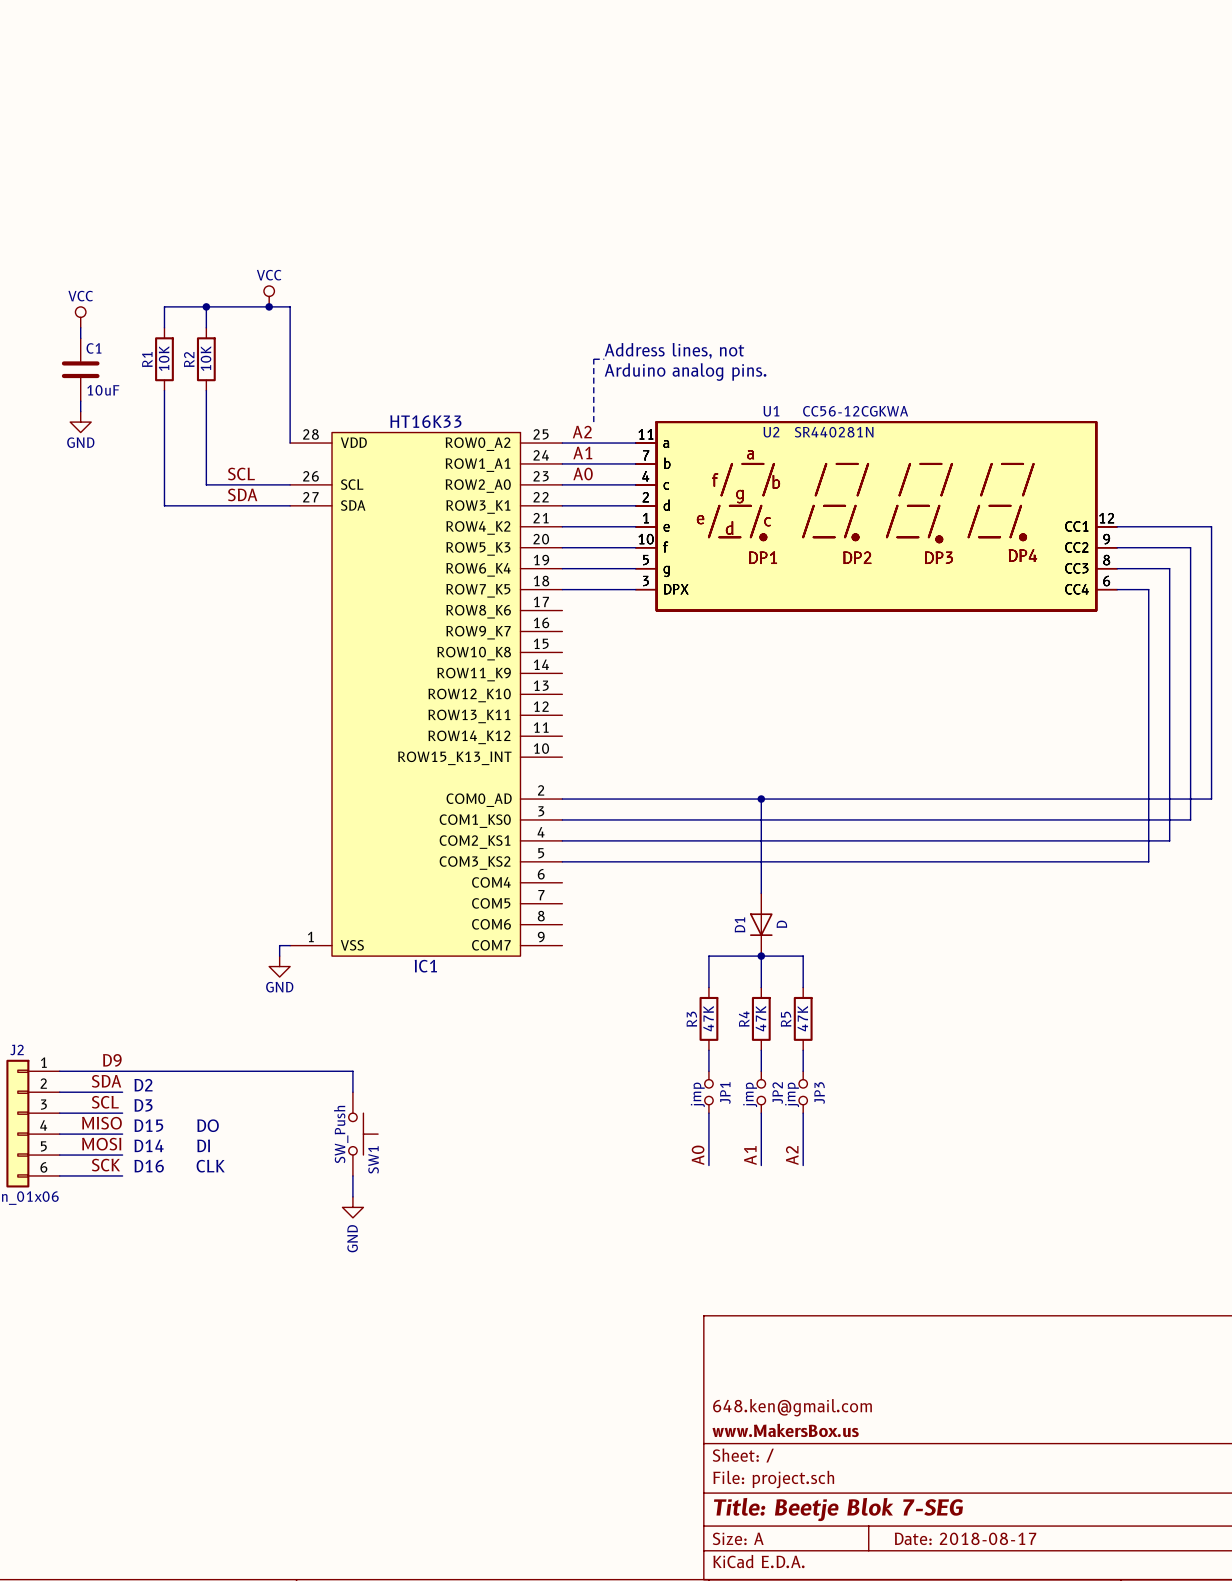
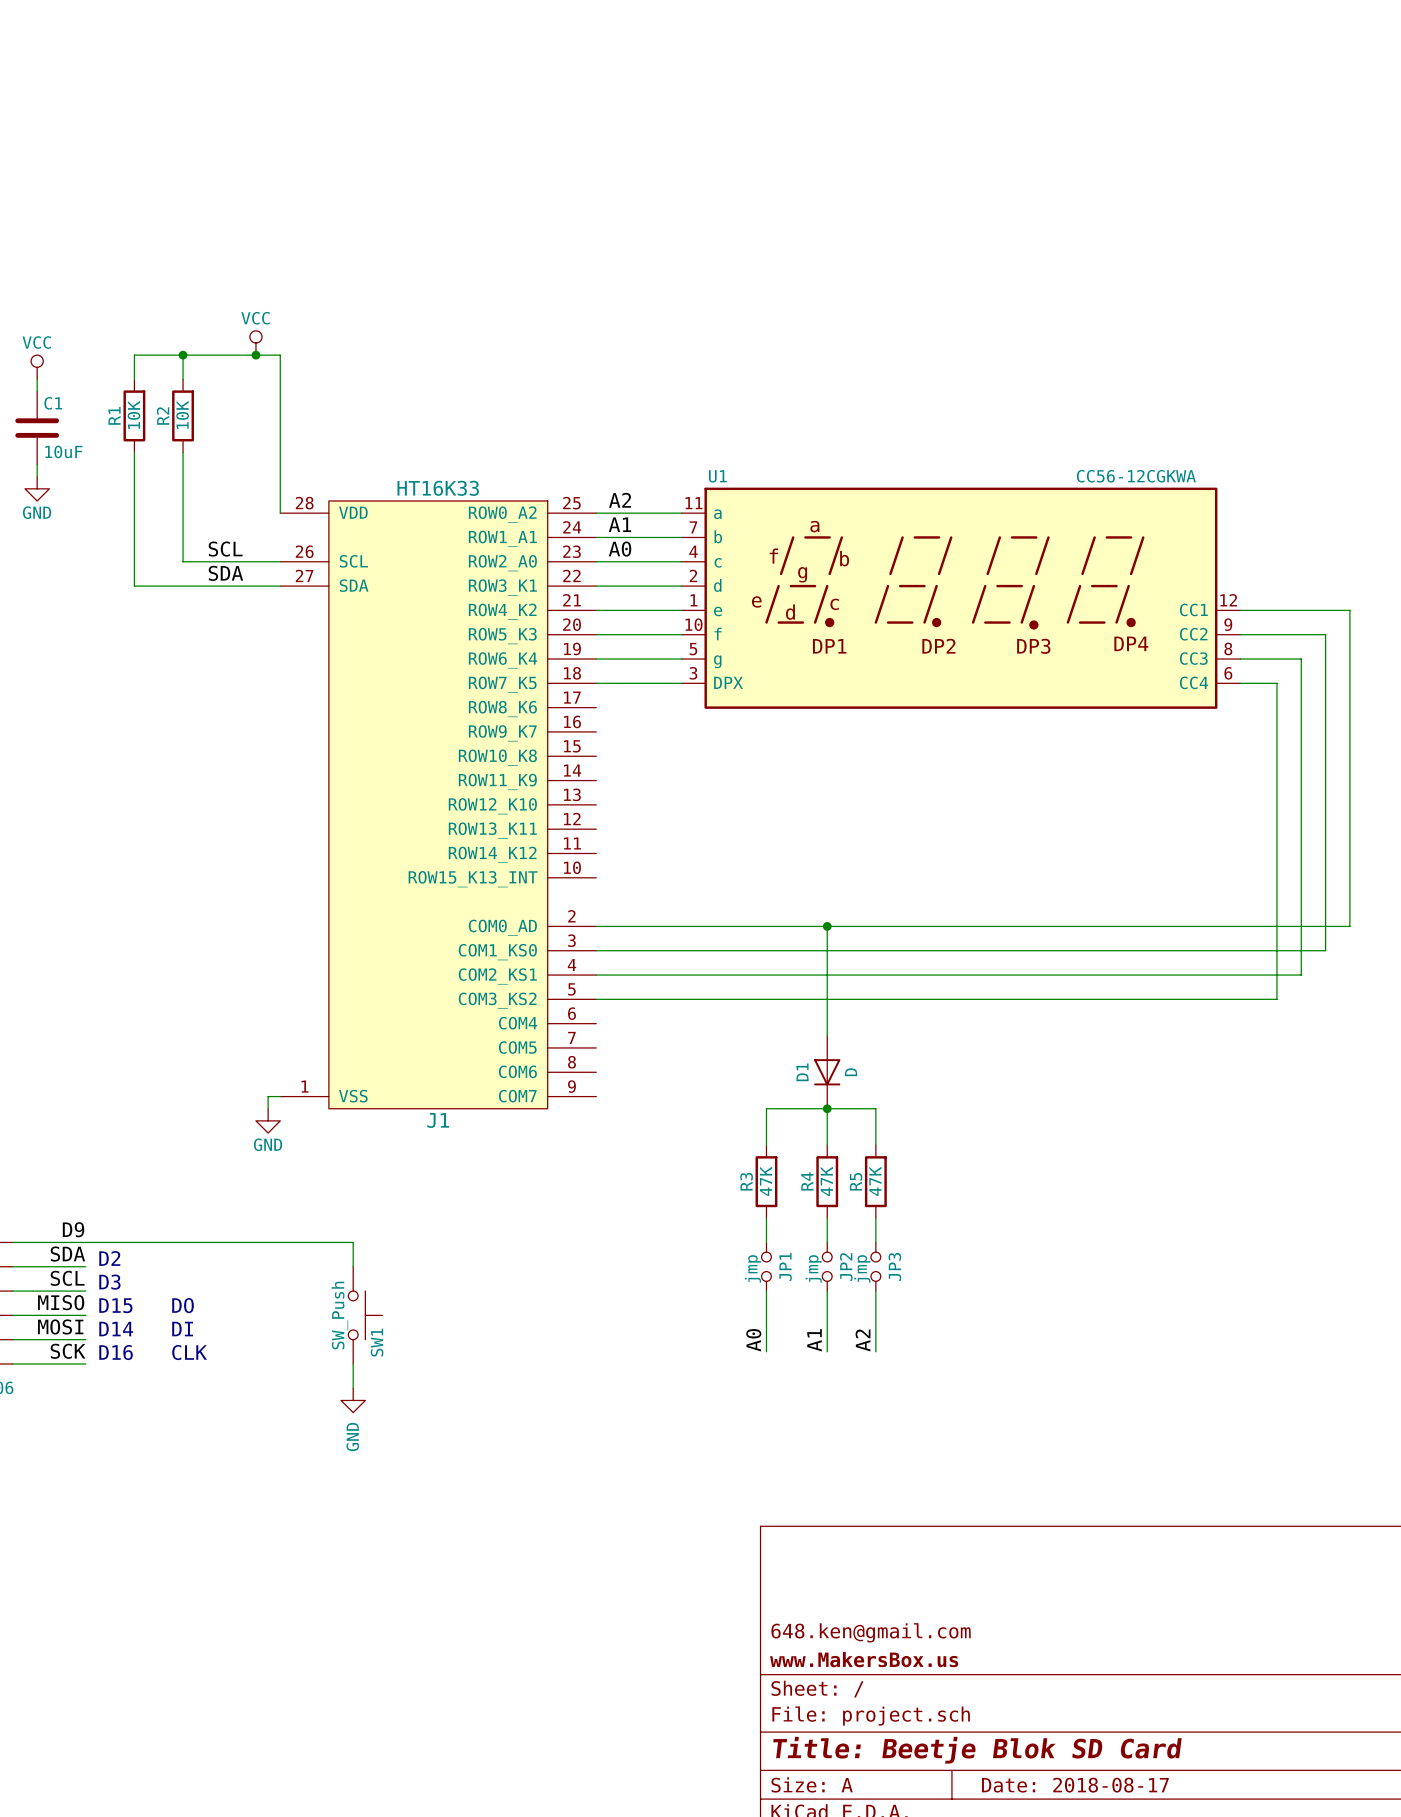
text: Address lines, not (674, 350) -> none
line: (604, 359) (593, 359) (593, 422) -> none
text: Arduino analog pins. (685, 372) -> none
U1 name position: U1 (771, 411) -> U1 (717, 476)
U1 value position: CC56-12CGKWA (855, 411) -> CC56-12CGKWA (1136, 476)
U2: SR440281N (876, 516) -> none
IC1 name: IC1 (425, 966) -> J1 (438, 1120)
title block: Title: Beetje Blok 7-SEG (838, 1509) -> Title: Beetje Blok SD Card (977, 1750)

